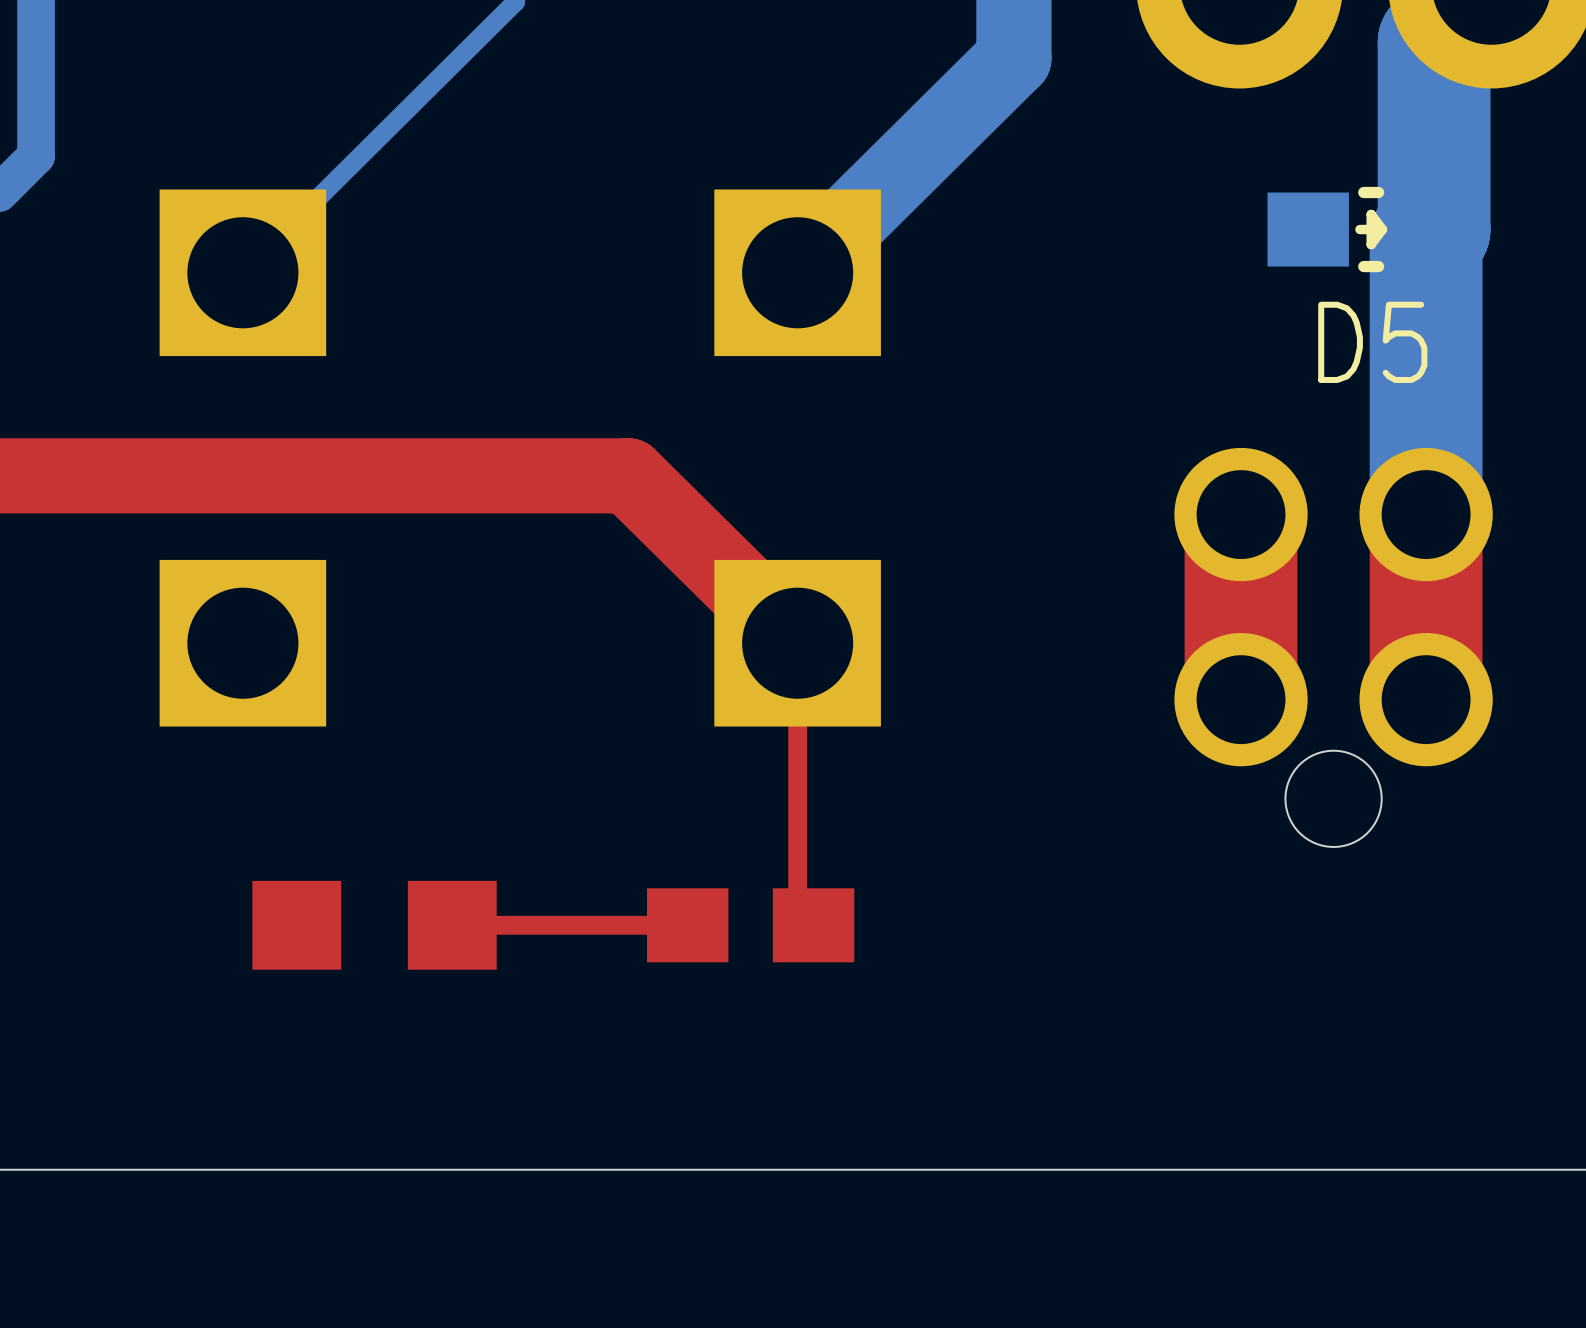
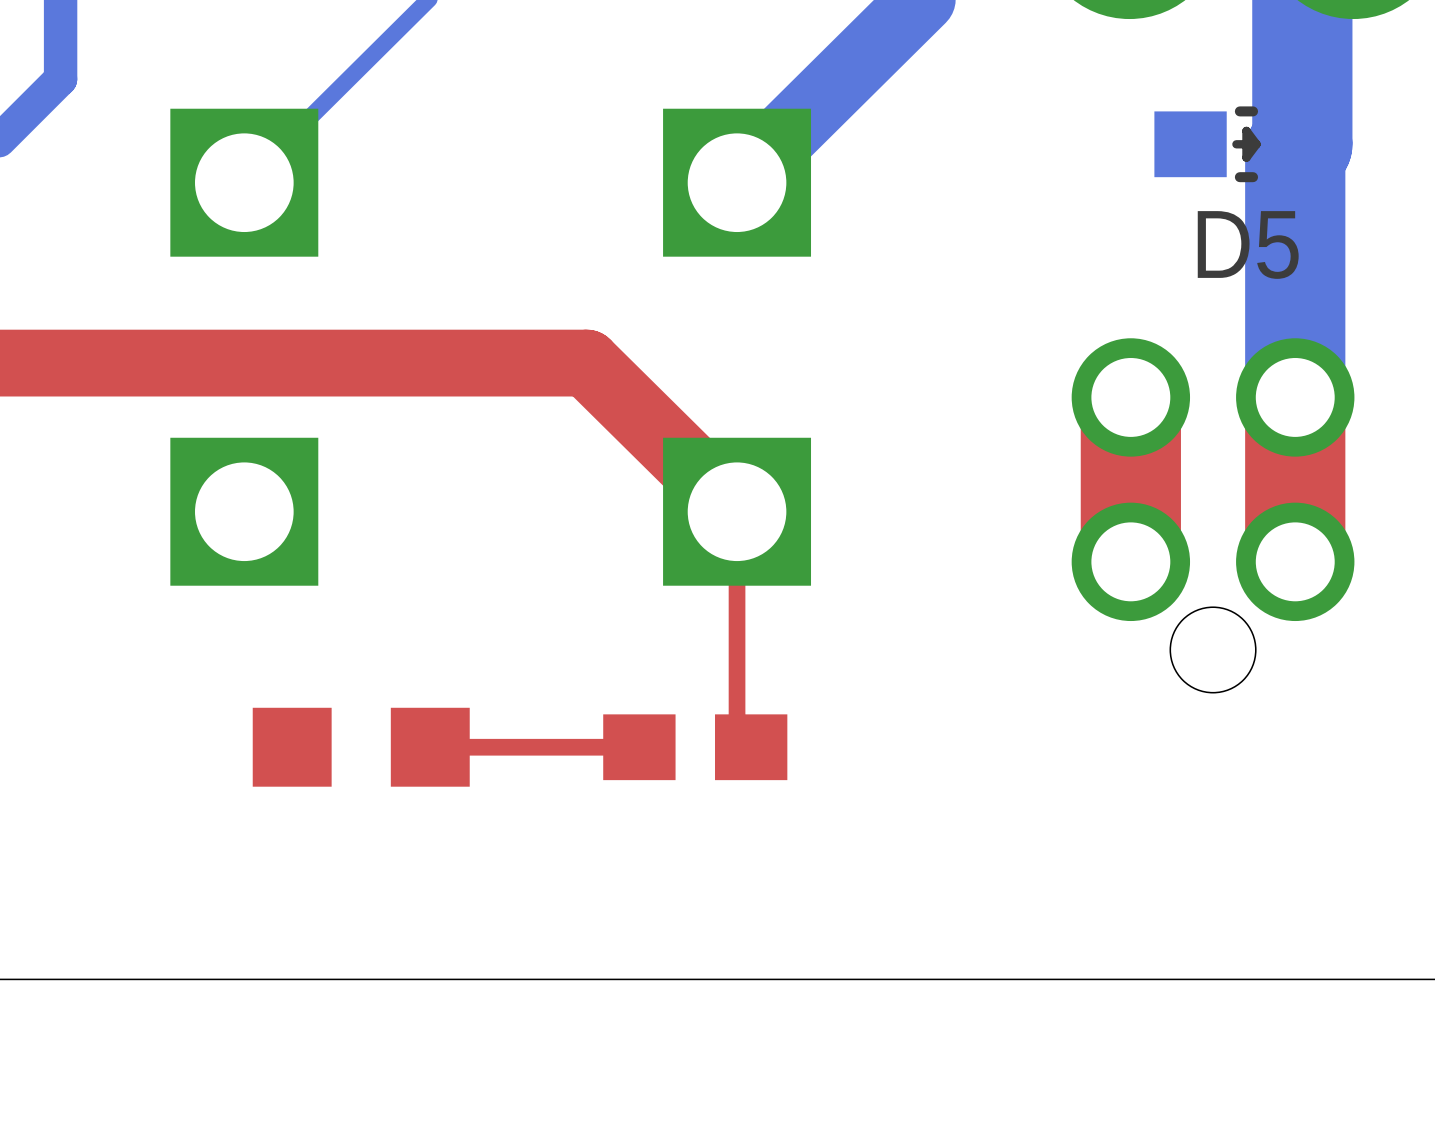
part position: (374, 925) -> (361, 747)
top track: (687, 925) (452, 925) -> (639, 747) (430, 747)
part position: (750, 925) -> (695, 747)

